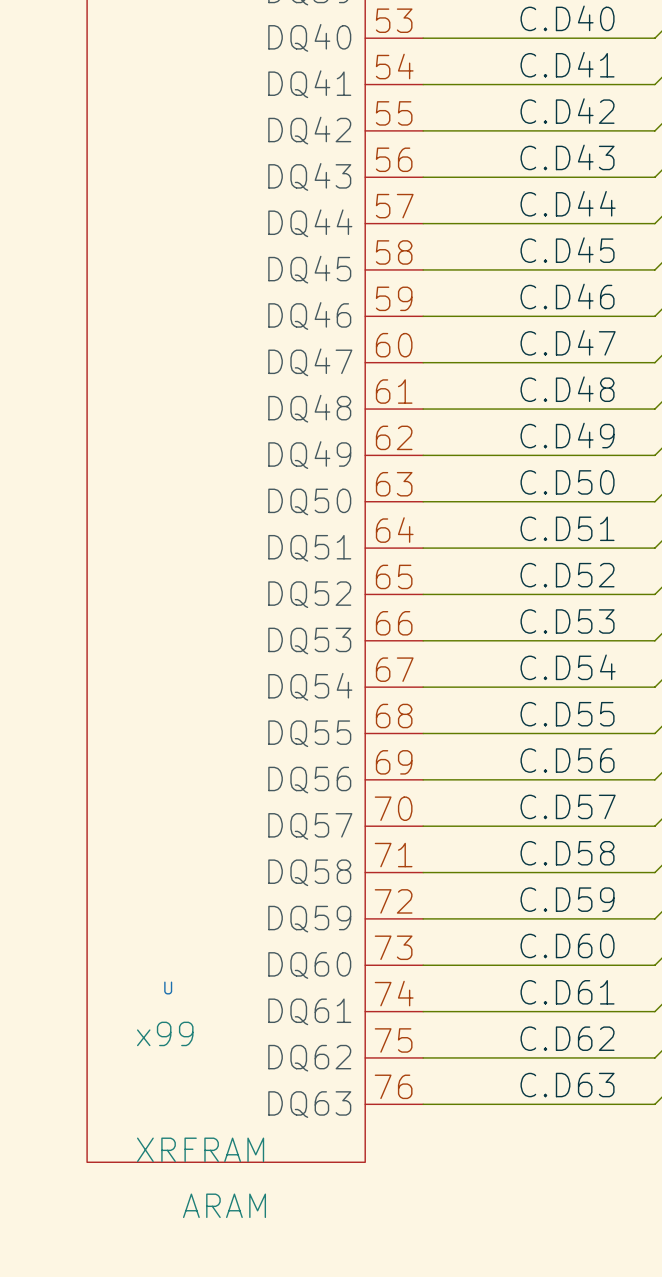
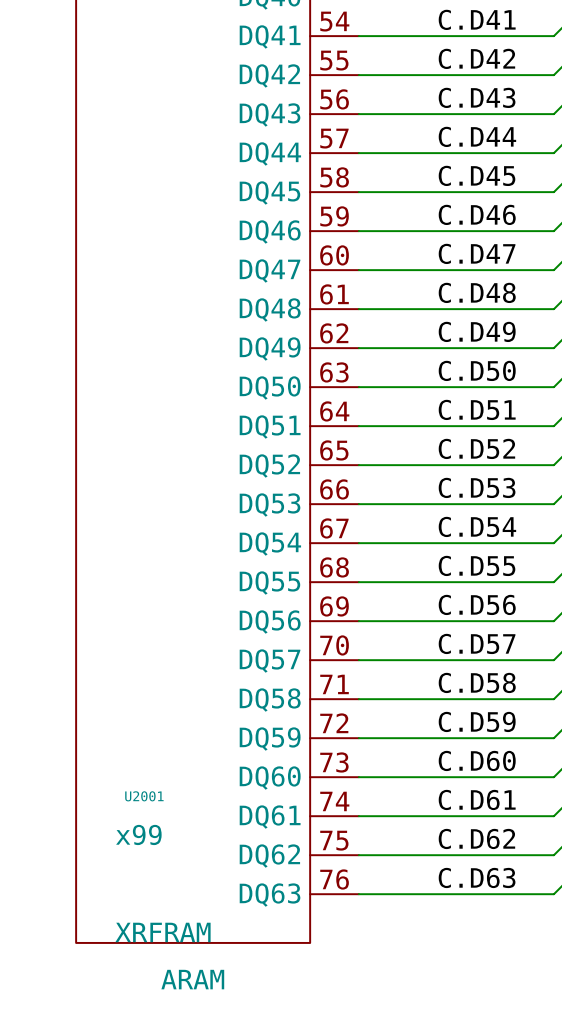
U name: U (168, 988) -> U2001 (144, 796)

